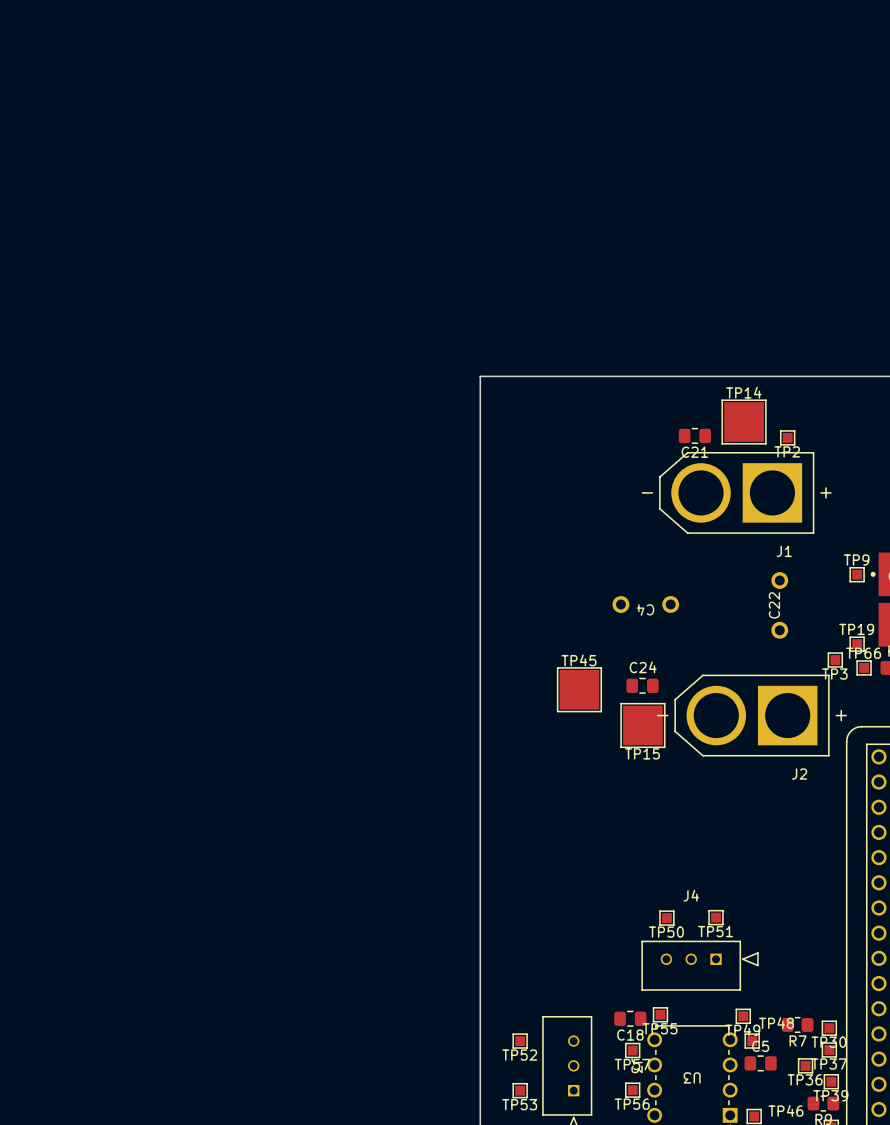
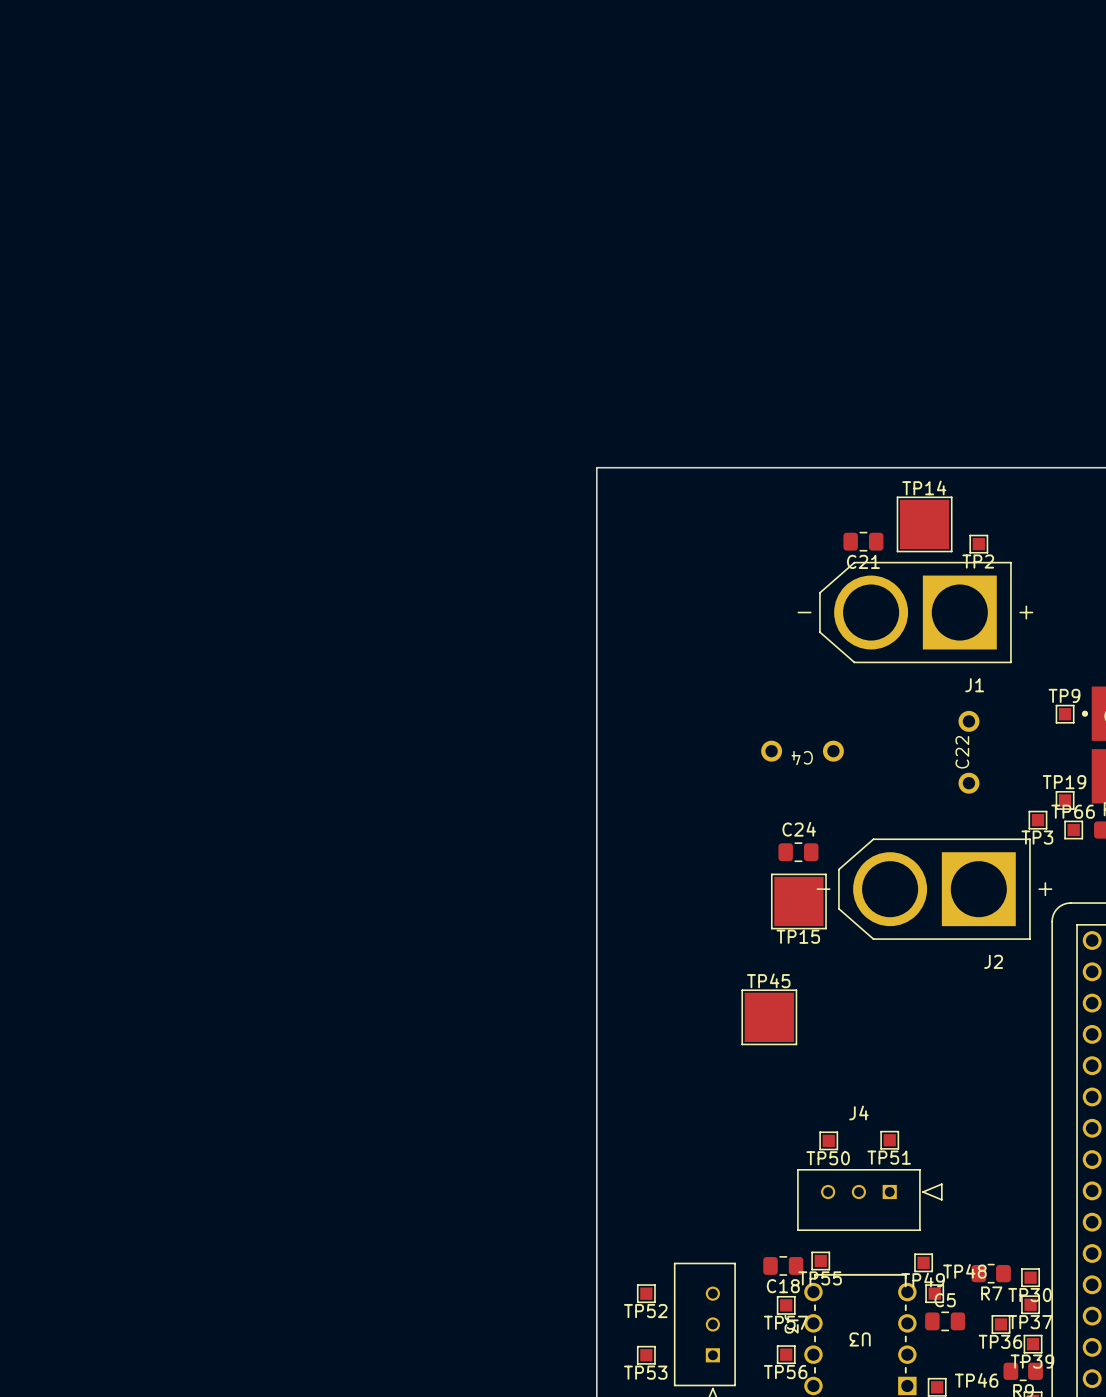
TP45 position: (579, 689) -> (769, 1017)

